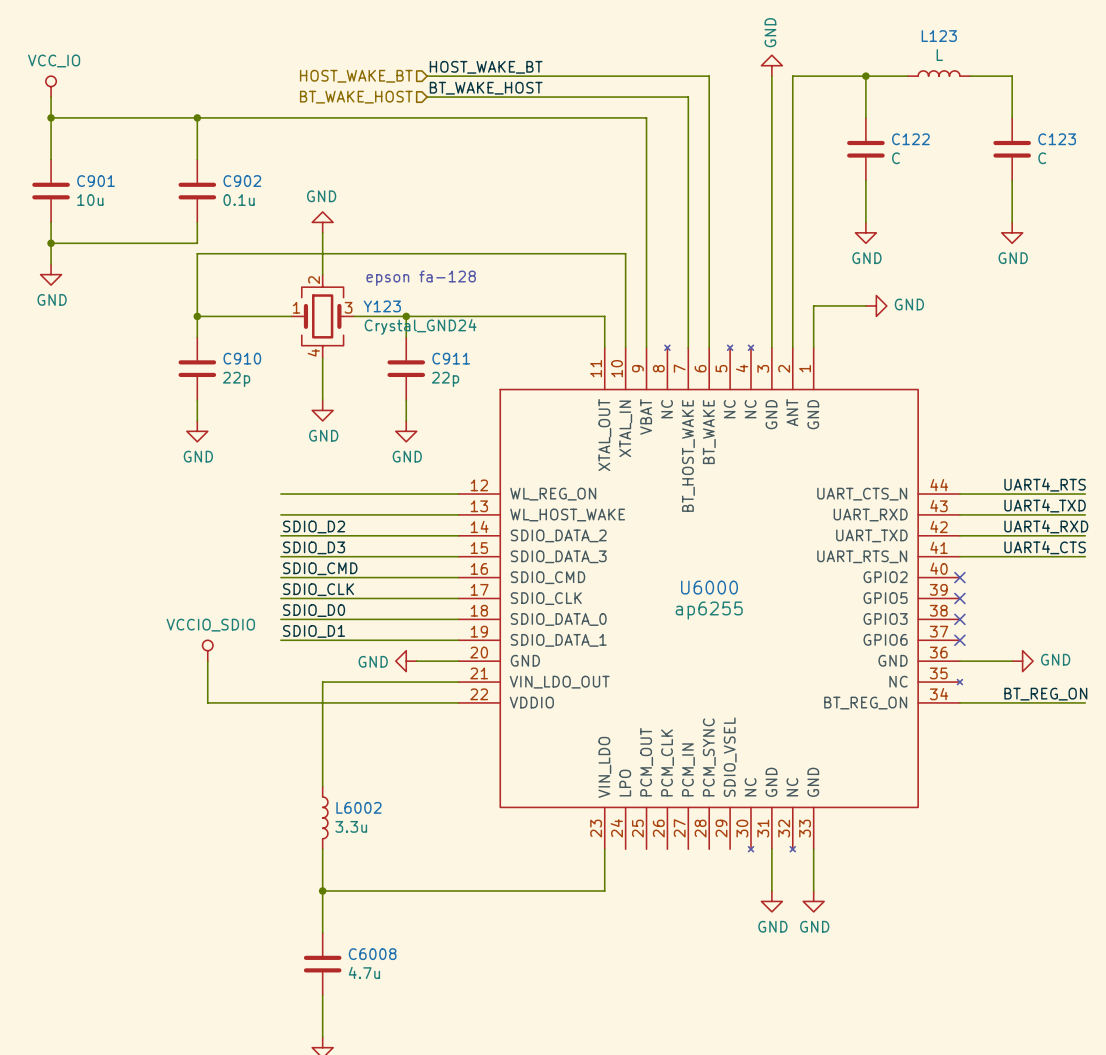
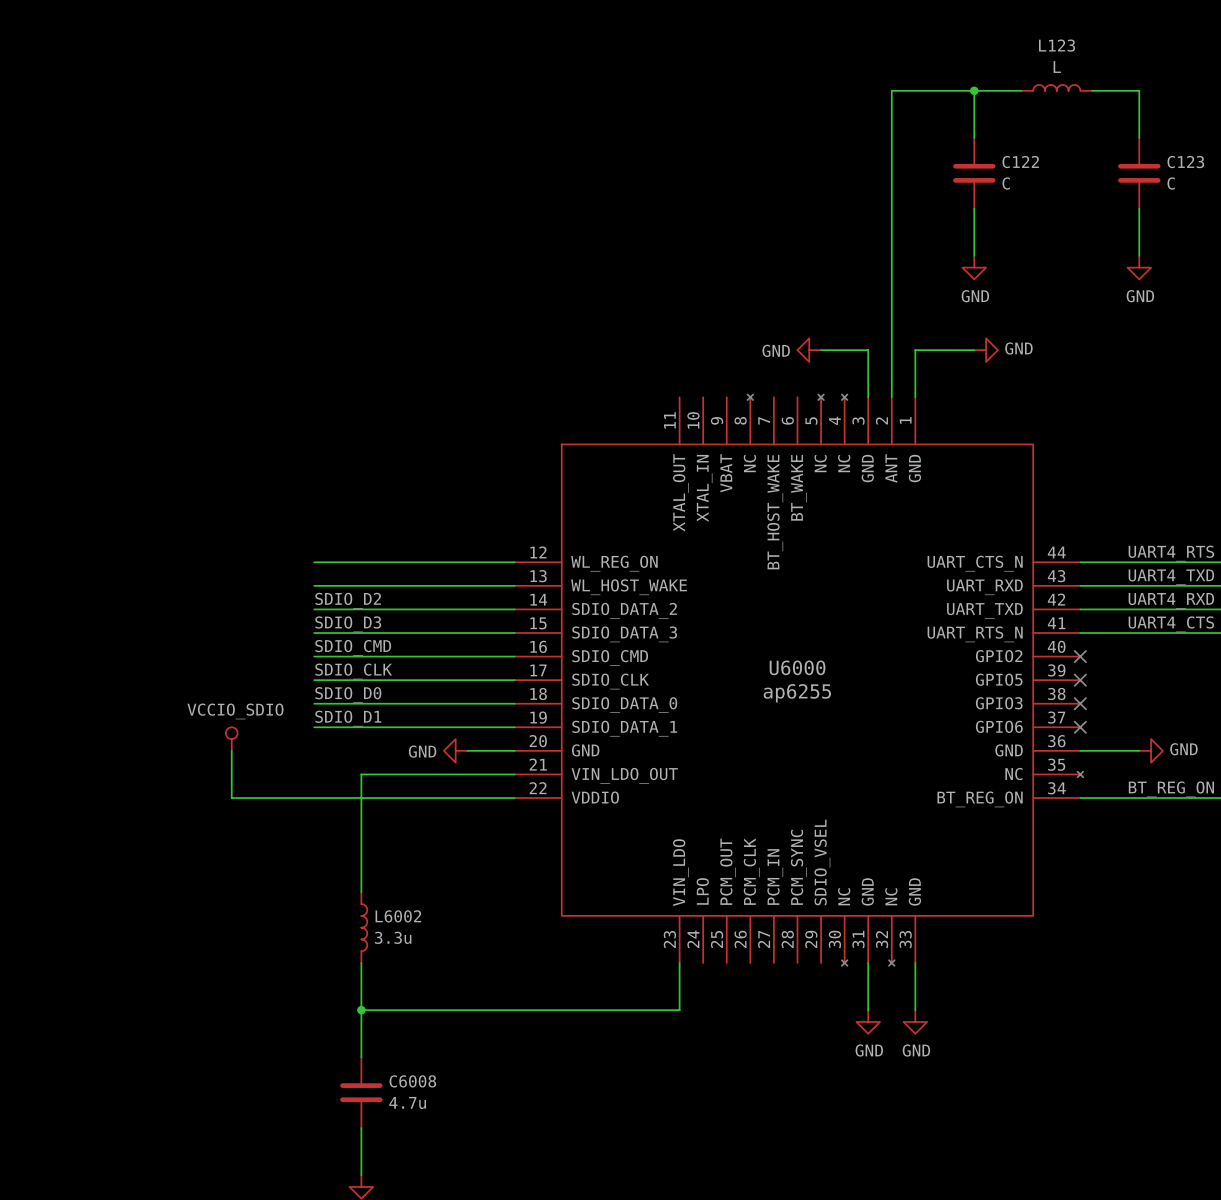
power symbol: GND (771, 65) -> none
label: HOST_WAKE_BT (486, 67) -> none
hierarchical label: HOST_WAKE_BT (356, 76) -> none
wire: (427, 76) (709, 76) (709, 347) -> none
wire: (771, 76) (771, 305) -> (821, 350) (868, 350)
power symbol: VCC_IO (51, 86) -> none
label: BT_WAKE_HOST (486, 88) -> none
wire: (51, 97) (51, 159) -> none
hierarchical label: BT_WAKE_HOST (356, 97) -> none
wire: (427, 97) (688, 97) (688, 347) -> none
wire: (51, 117) (646, 117) (646, 347) -> none
junction: (51, 117) -> none
wire: (197, 117) (197, 159) -> none
junction: (197, 117) -> none
C901: 10u (51, 191) -> none
C902: 0.1u (197, 191) -> none
wire: (51, 222) (51, 264) -> none
wire: (197, 222) (197, 243) (51, 243) -> none
power symbol: GND (322, 222) -> none
wire: (322, 232) (322, 274) -> none
junction: (51, 243) -> none
power symbol: GND (51, 274) -> none
text: epson fa-128 (421, 278) -> none
power symbol: none -> GND (809, 350)
wire: (197, 316) (291, 316) -> none
junction: (197, 316) -> none
Y123: Crystal_GND24 (322, 316) -> none
wire: (354, 316) (604, 316) (604, 347) -> none
wire: (406, 316) (406, 337) -> none
junction: (406, 316) -> none
wire: (197, 337) (197, 253) (625, 253) (625, 347) -> none
wire: (322, 358) (322, 399) -> none
C910: 22p (197, 368) -> none
C911: 22p (406, 368) -> none
wire: (197, 399) (197, 420) -> none
wire: (406, 399) (406, 420) -> none
power symbol: GND (322, 410) -> none
power symbol: GND (197, 431) -> none
power symbol: GND (406, 431) -> none

